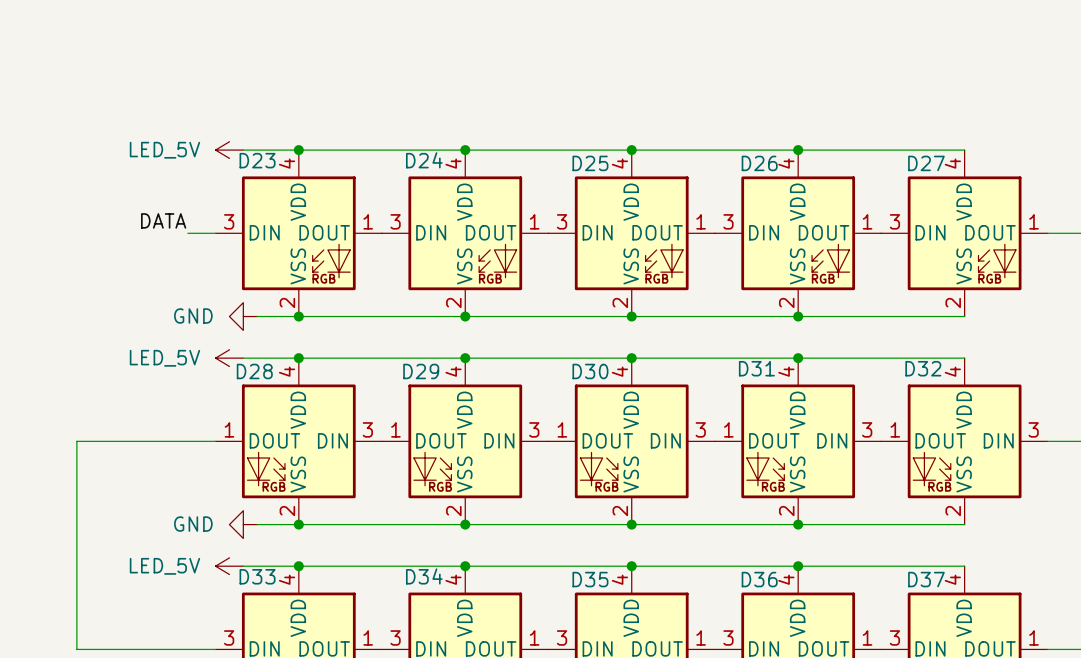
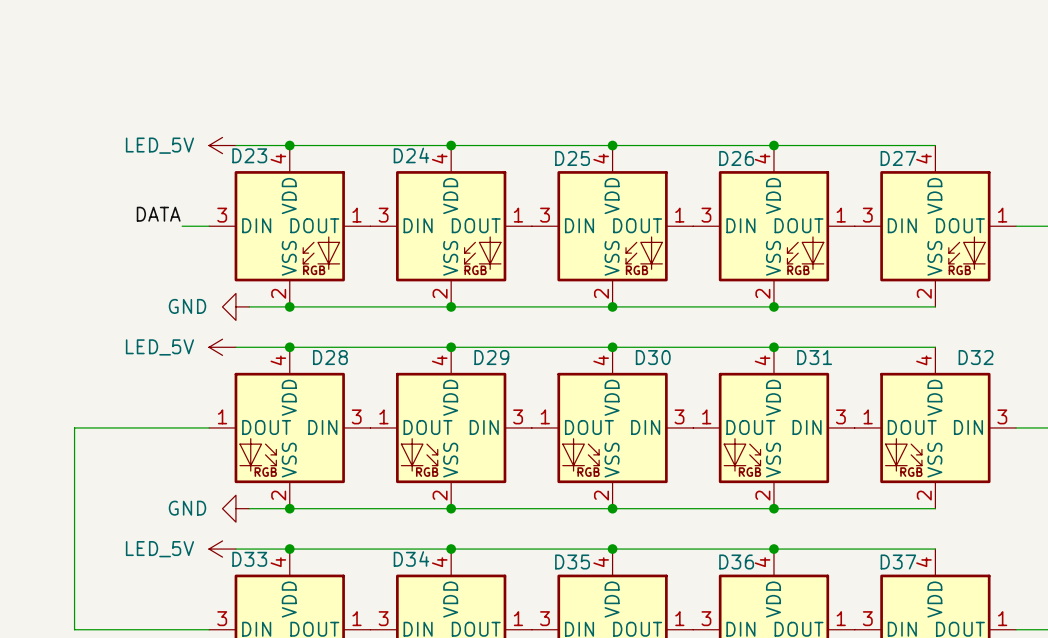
D31 name position: D31 (756, 368) -> D31 (814, 357)
D32 name position: D32 (923, 368) -> D32 (976, 357)
D28 name position: D28 (254, 371) -> D28 (330, 357)
D29 name position: D29 (421, 371) -> D29 (491, 357)
D30 name position: D30 (590, 371) -> D30 (653, 357)

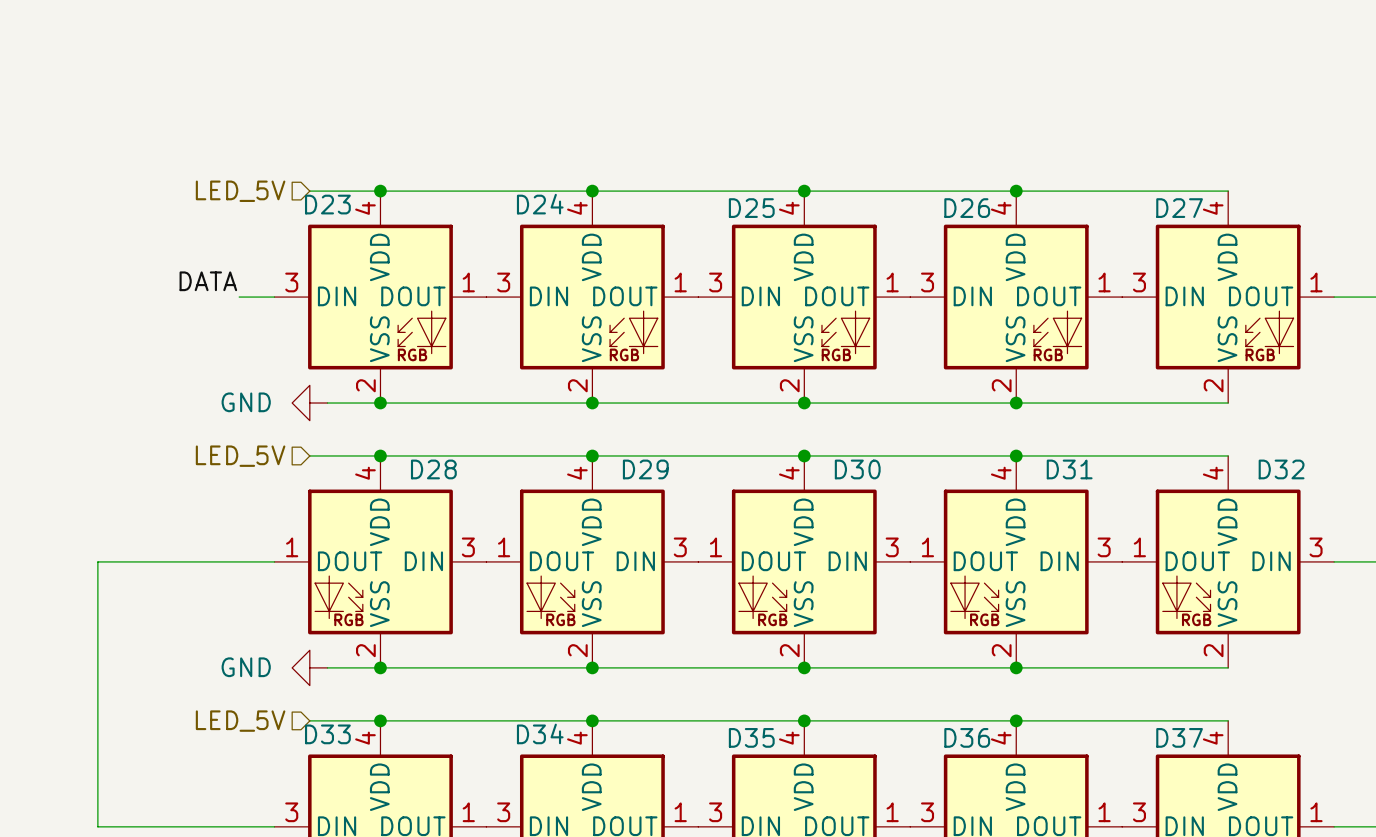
hierarchical label: none -> LED_5V (240, 191)
power symbol: LED_5V (222, 145) -> none
hierarchical label: none -> LED_5V (240, 456)
power symbol: LED_5V (222, 347) -> none
hierarchical label: none -> LED_5V (240, 721)
power symbol: LED_5V (222, 549) -> none

